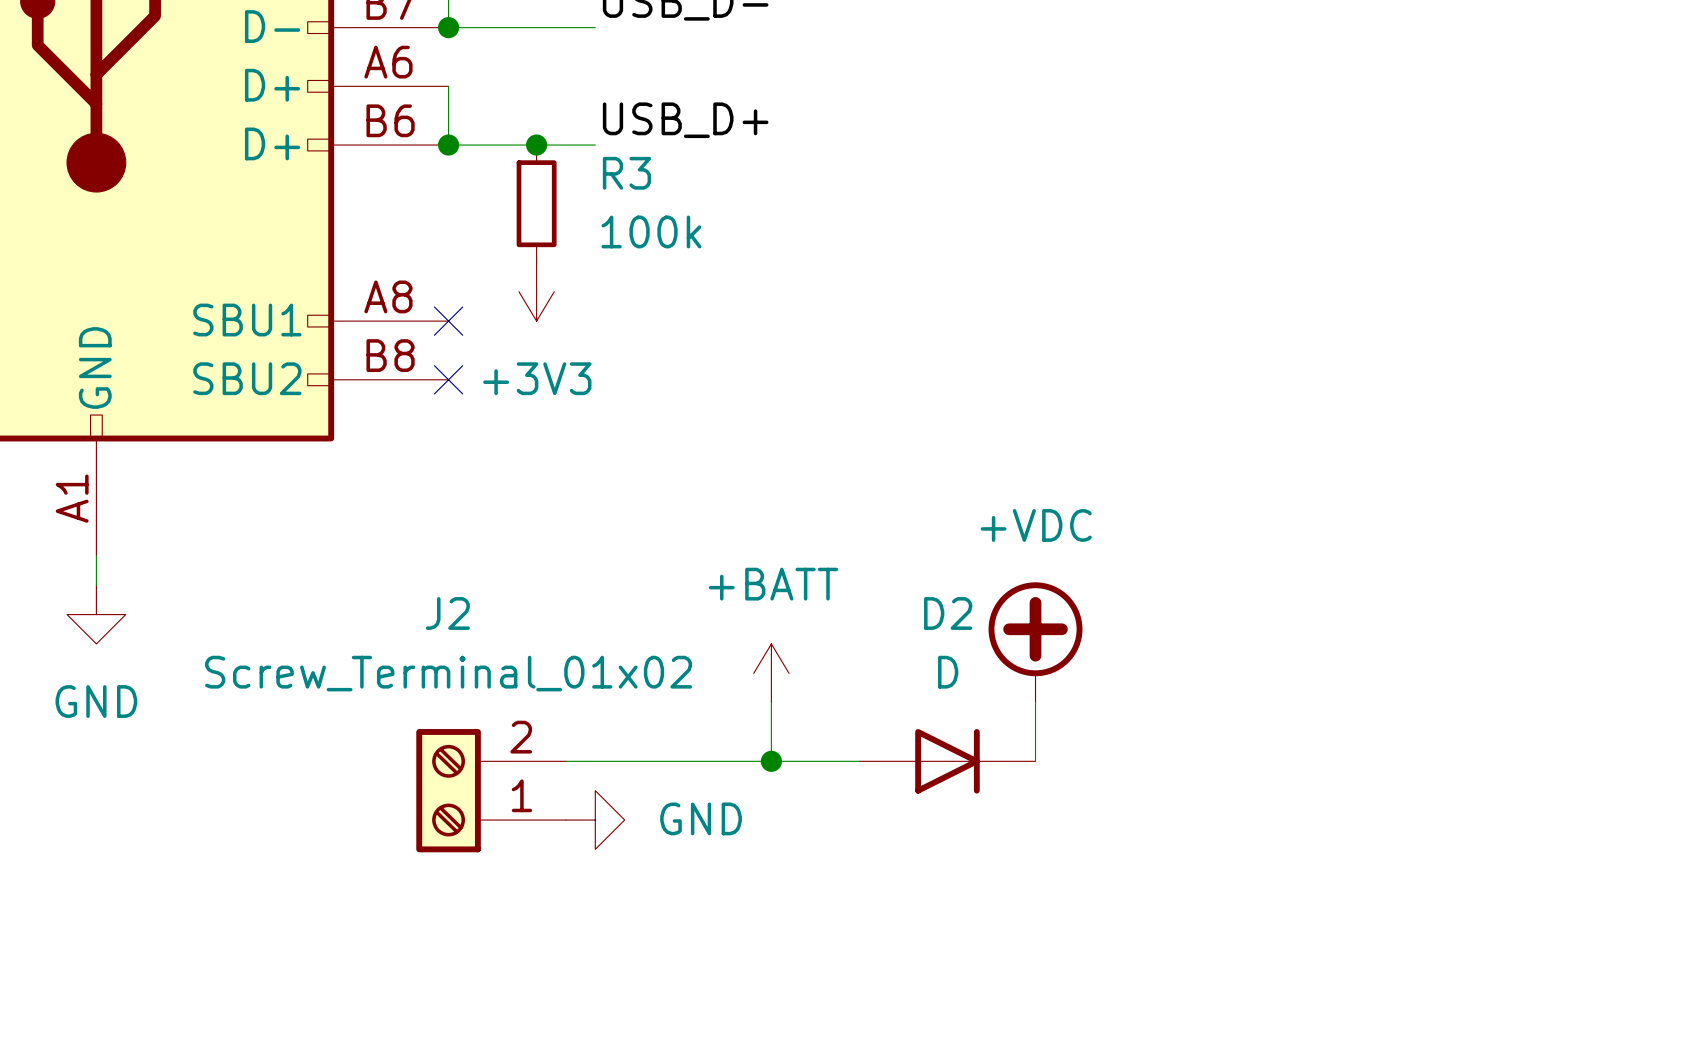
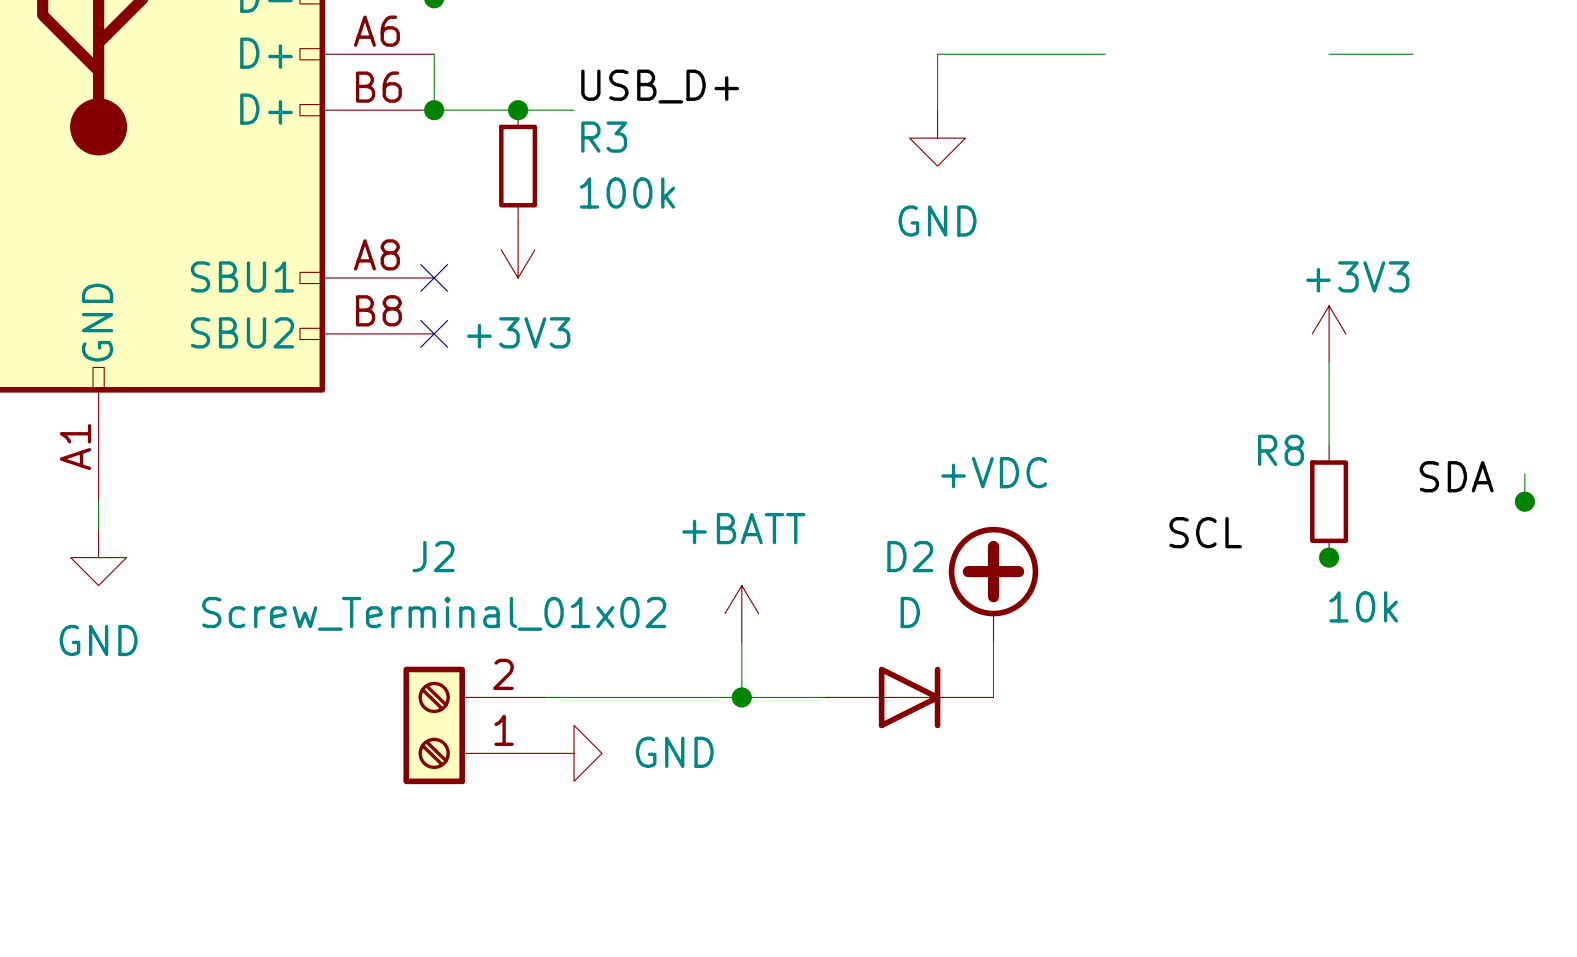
wire: none -> (1105, 54) (937, 54) (937, 110)
wire: none -> (1329, 54) (1412, 54)
power symbol: none -> GND (937, 138)
power symbol: none -> +3V3 (1329, 333)
wire: none -> (1329, 361) (1329, 445)
wire: none -> (1524, 473) (1524, 501)
label: none -> SDA (1456, 476)
R8: none -> 10k (1329, 501)
junction: none -> (1524, 501)
label: none -> SCL (1205, 532)
junction: none -> (1329, 557)

